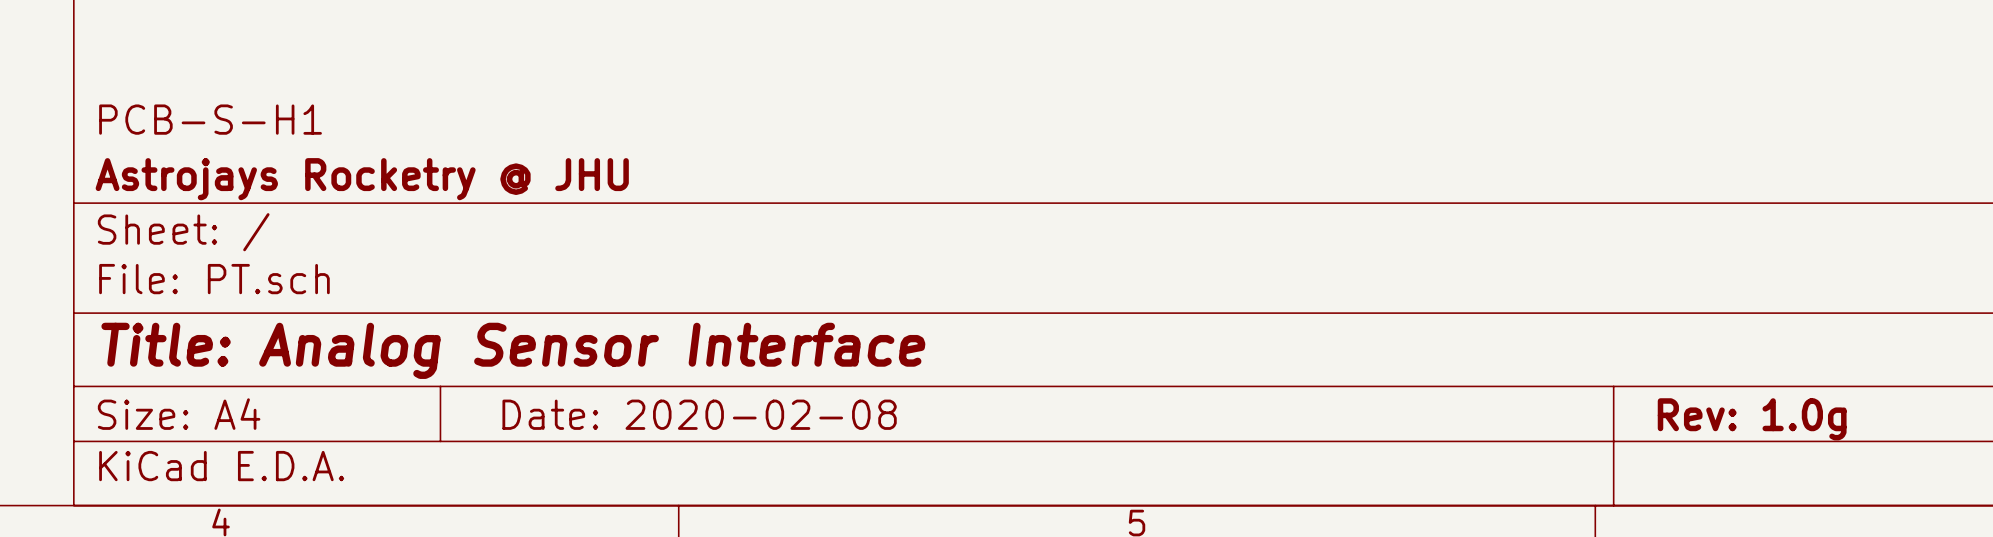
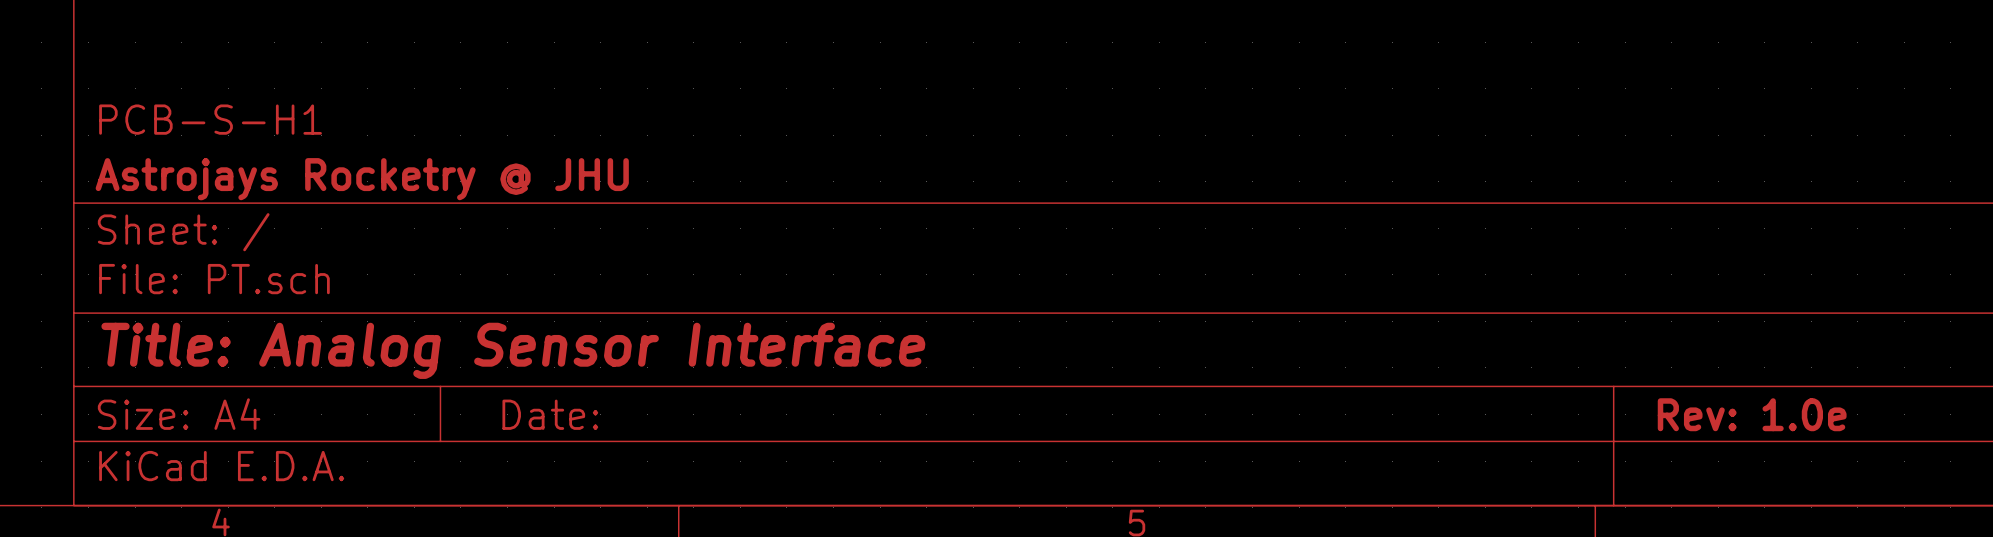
title block: Date: 2020-02-08 (699, 414) -> Date: (550, 414)
title block: Rev: 1.0g (1752, 419) -> Rev: 1.0e (1752, 414)

